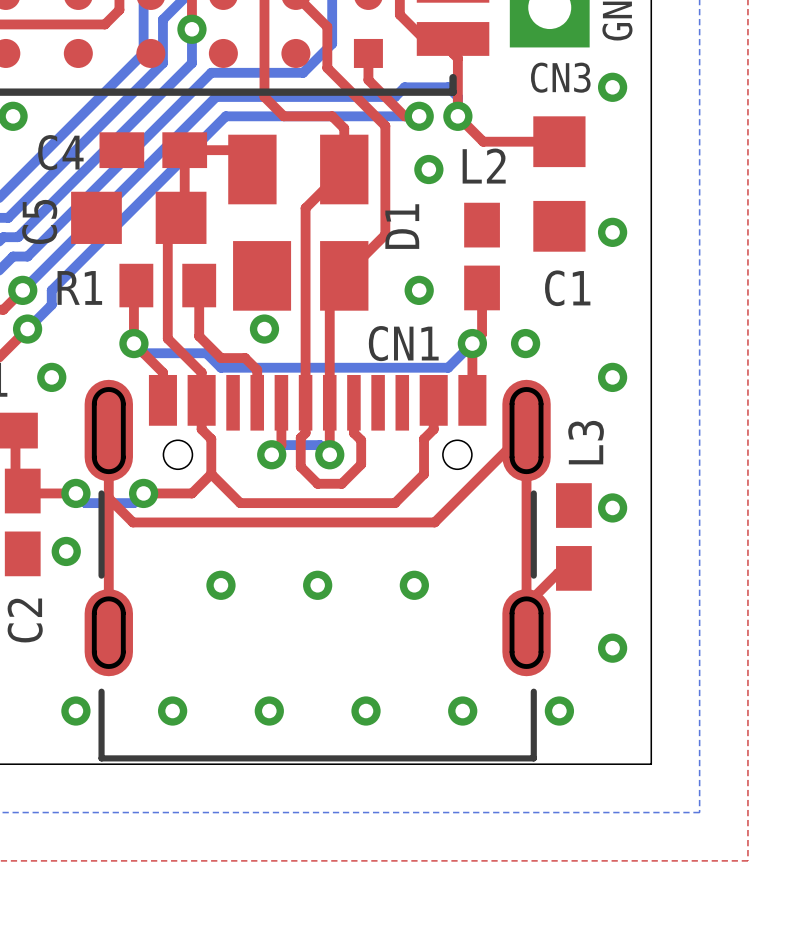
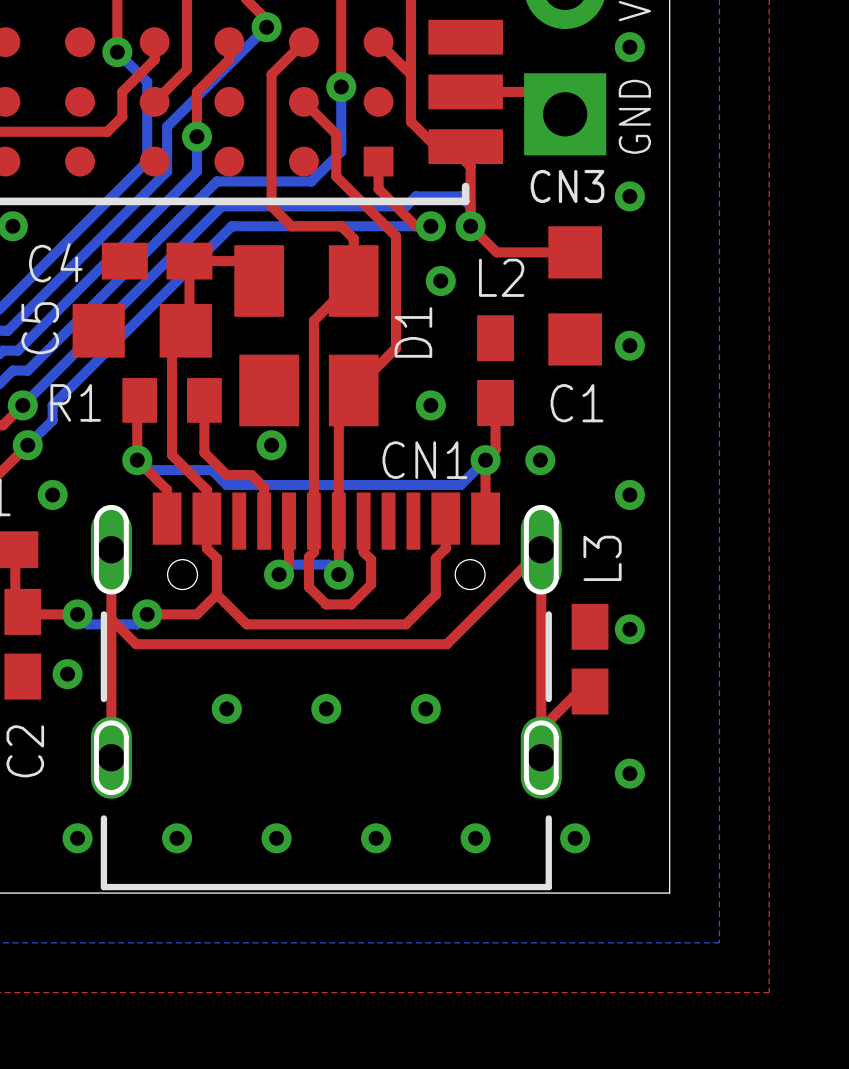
CN1 footprint: [84, 374, 551, 762] -> [90, 492, 562, 891]

